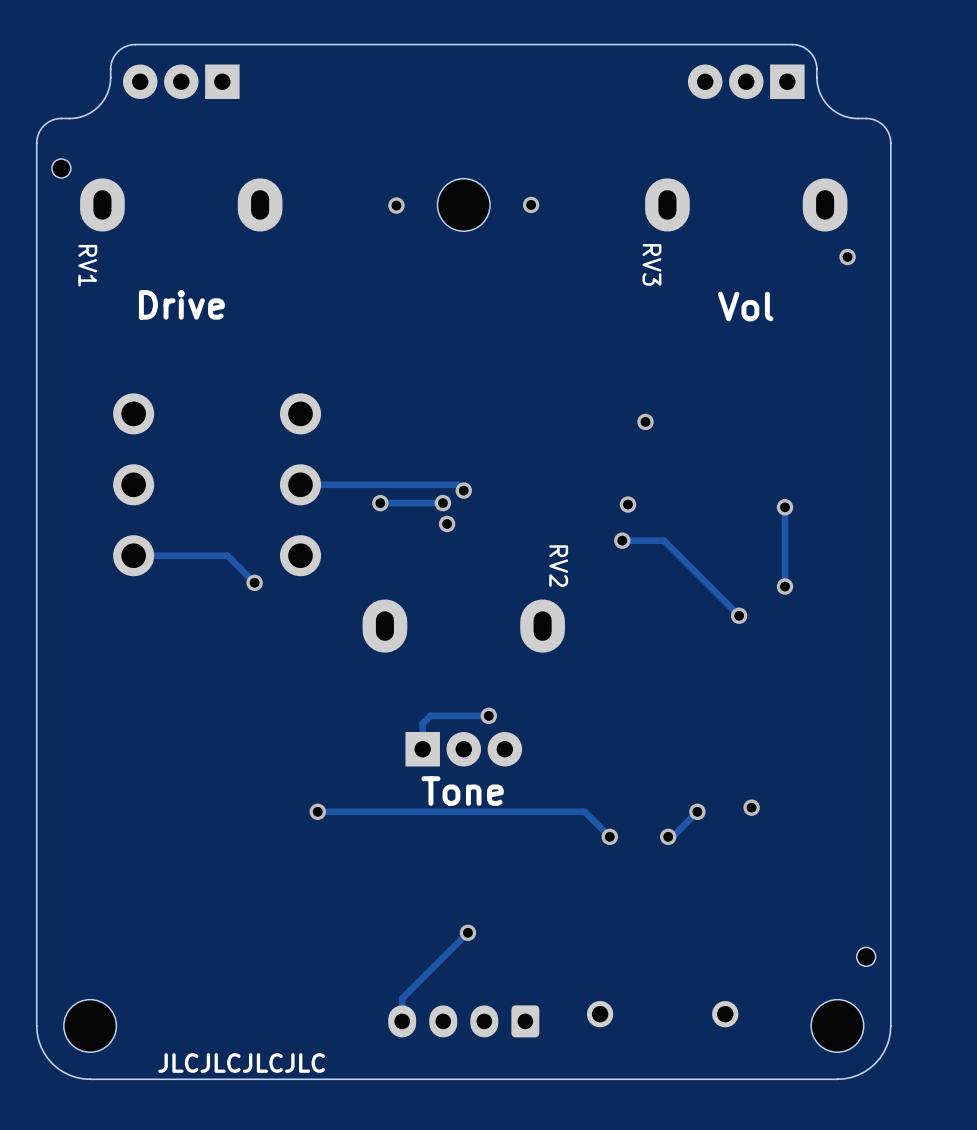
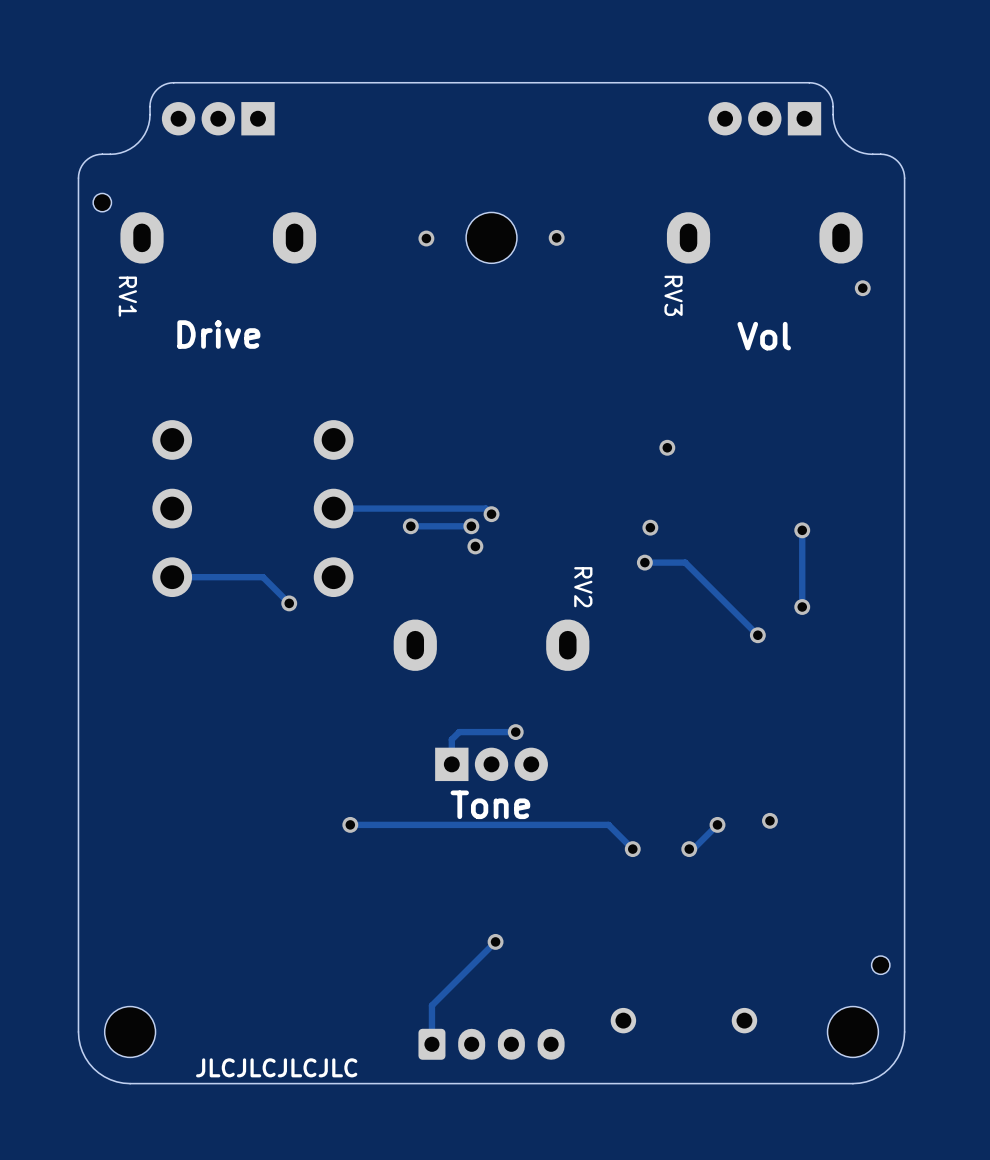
part rotation: 0° (463, 1021) -> 180° (491, 1044)

